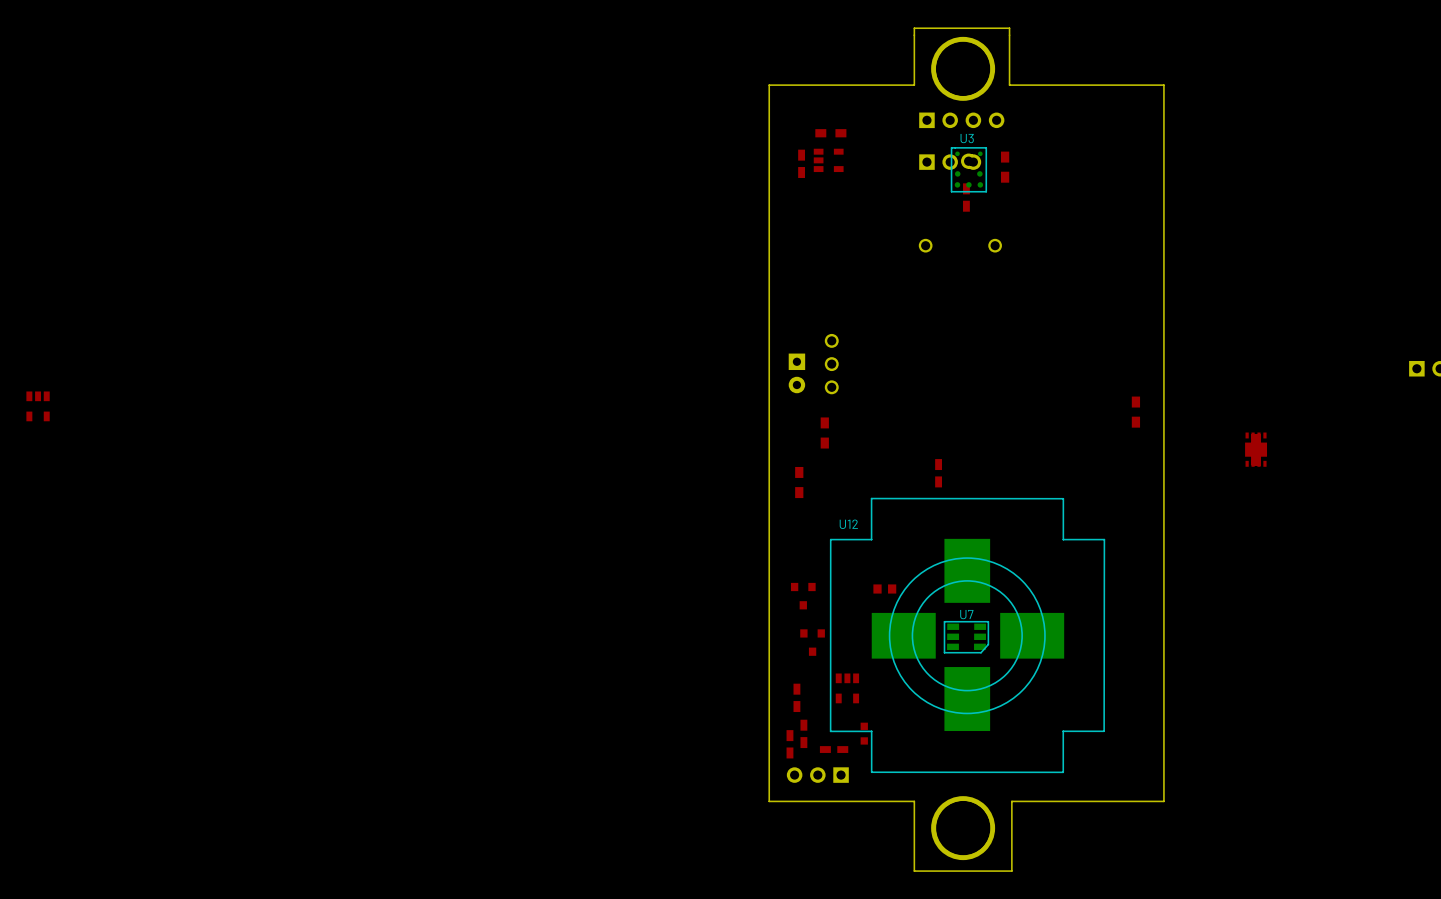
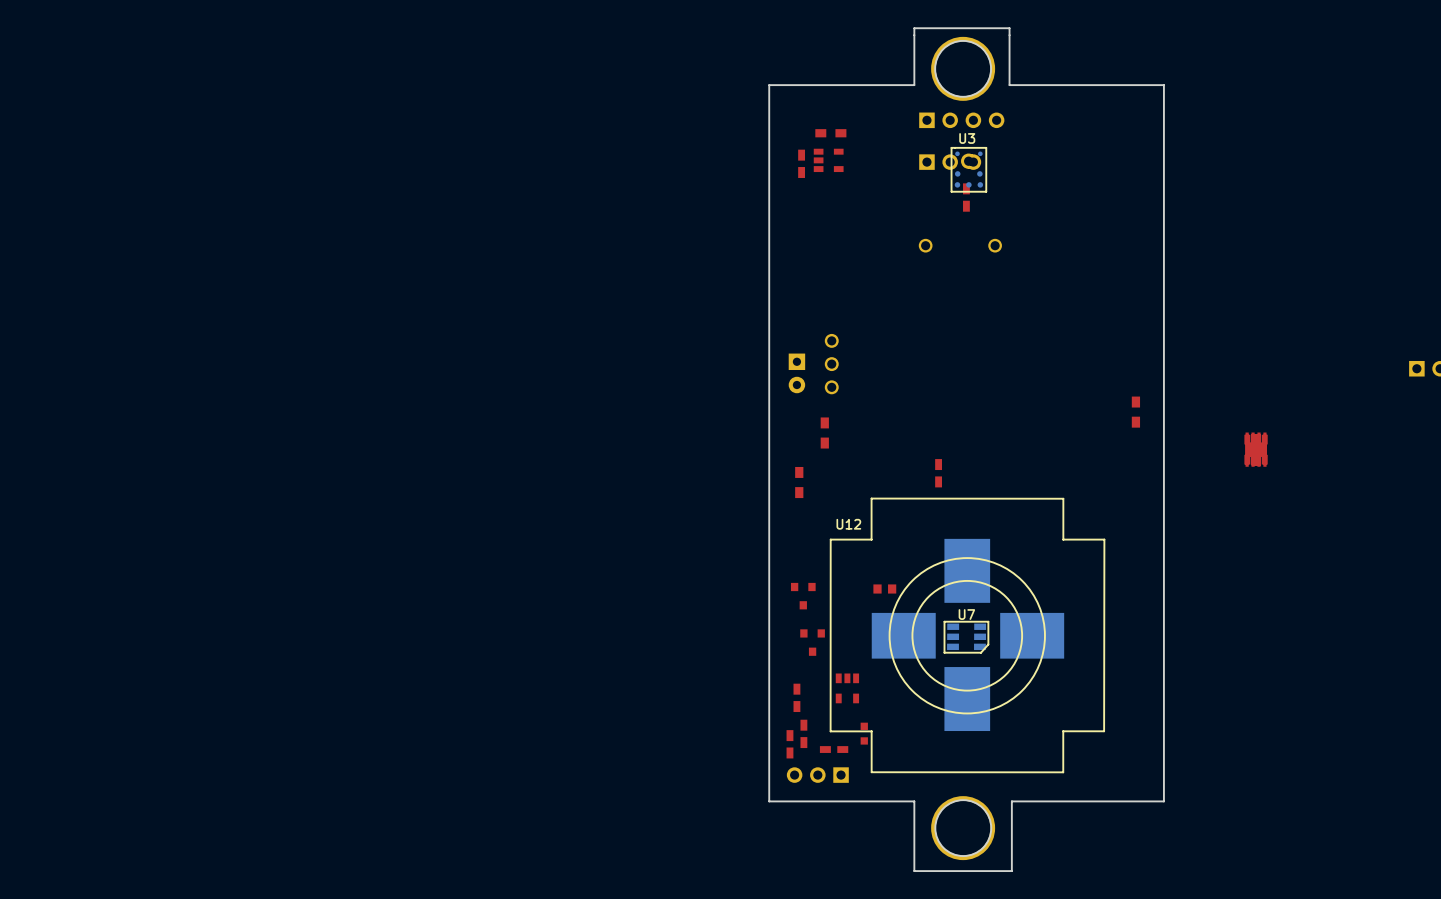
part: (1005, 167) -> none
part: (38, 406) -> none
part: none -> (1256, 449)

